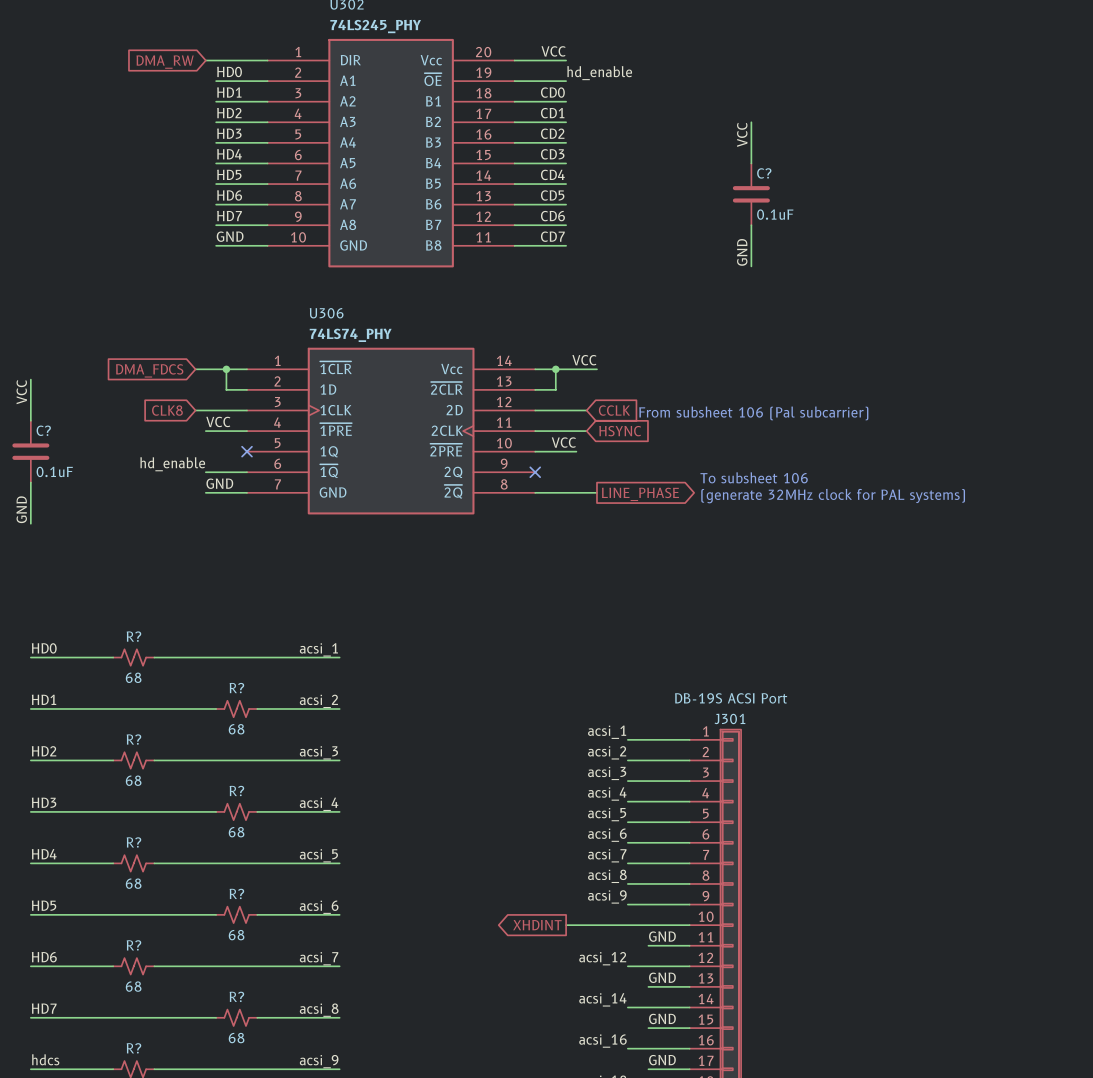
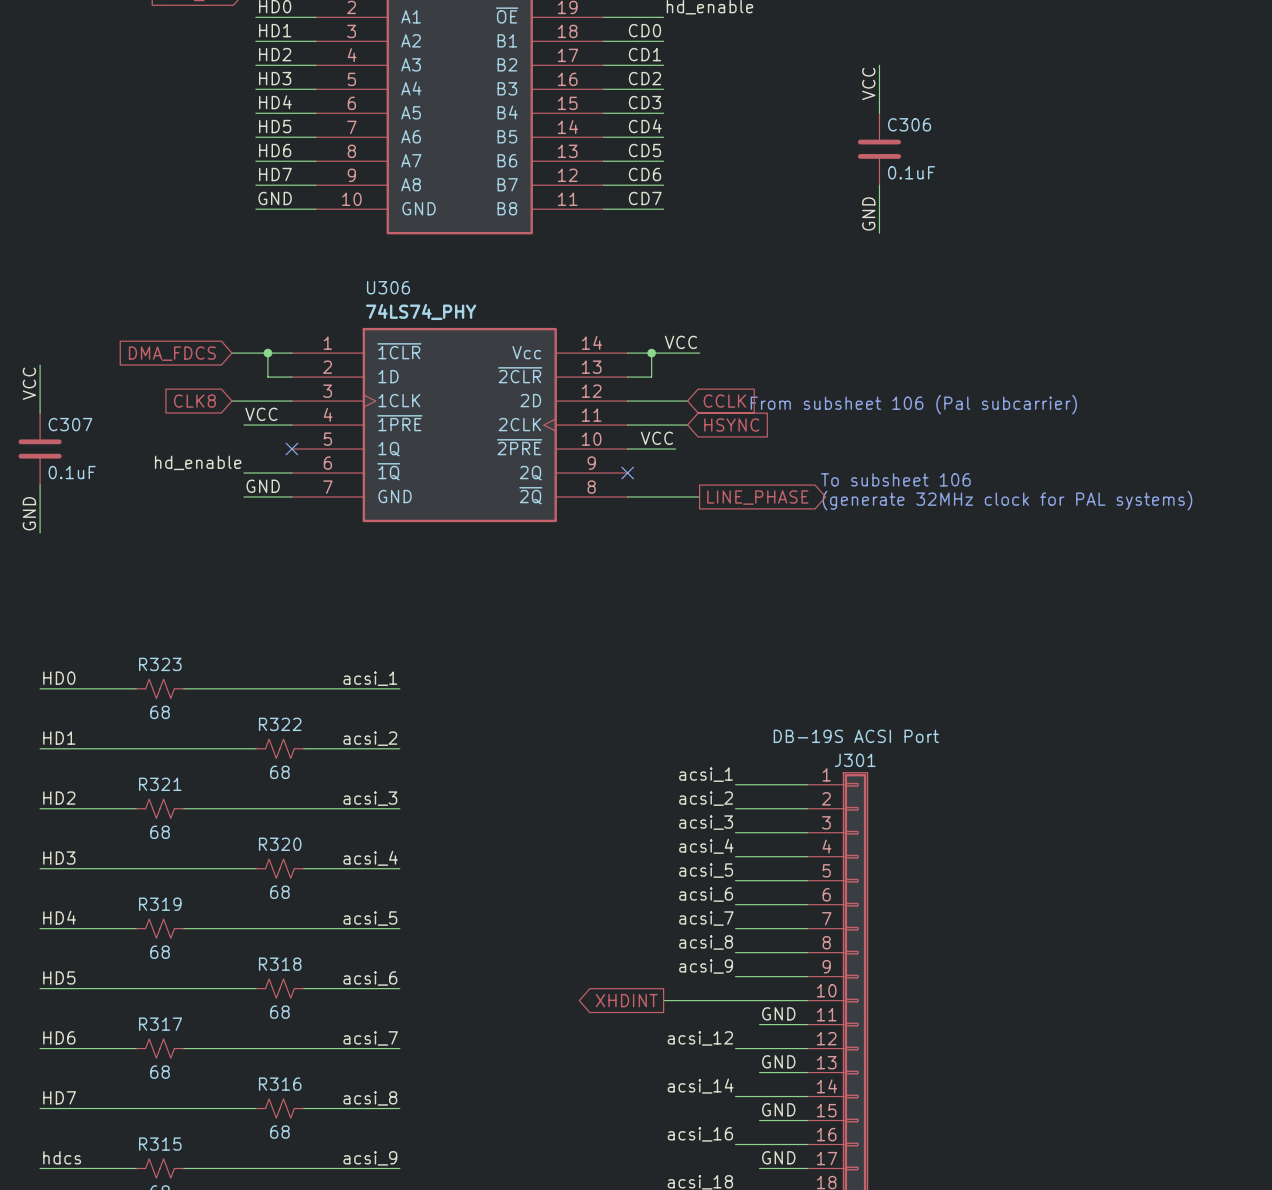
C? name: C? (764, 173) -> C306 (909, 124)
C? name: C? (43, 430) -> C307 (70, 424)
R? name: R? (133, 636) -> R323 (160, 664)
R? name: R? (236, 688) -> R322 (280, 724)
R? name: R? (133, 739) -> R321 (160, 784)
R? name: R? (236, 791) -> R320 (280, 844)
R? name: R? (133, 842) -> R319 (160, 904)
R? name: R? (236, 893) -> R318 (280, 964)
R? name: R? (133, 945) -> R317 (160, 1024)
R? name: R? (236, 996) -> R316 (280, 1084)
R? name: R? (133, 1048) -> R315 (160, 1144)

